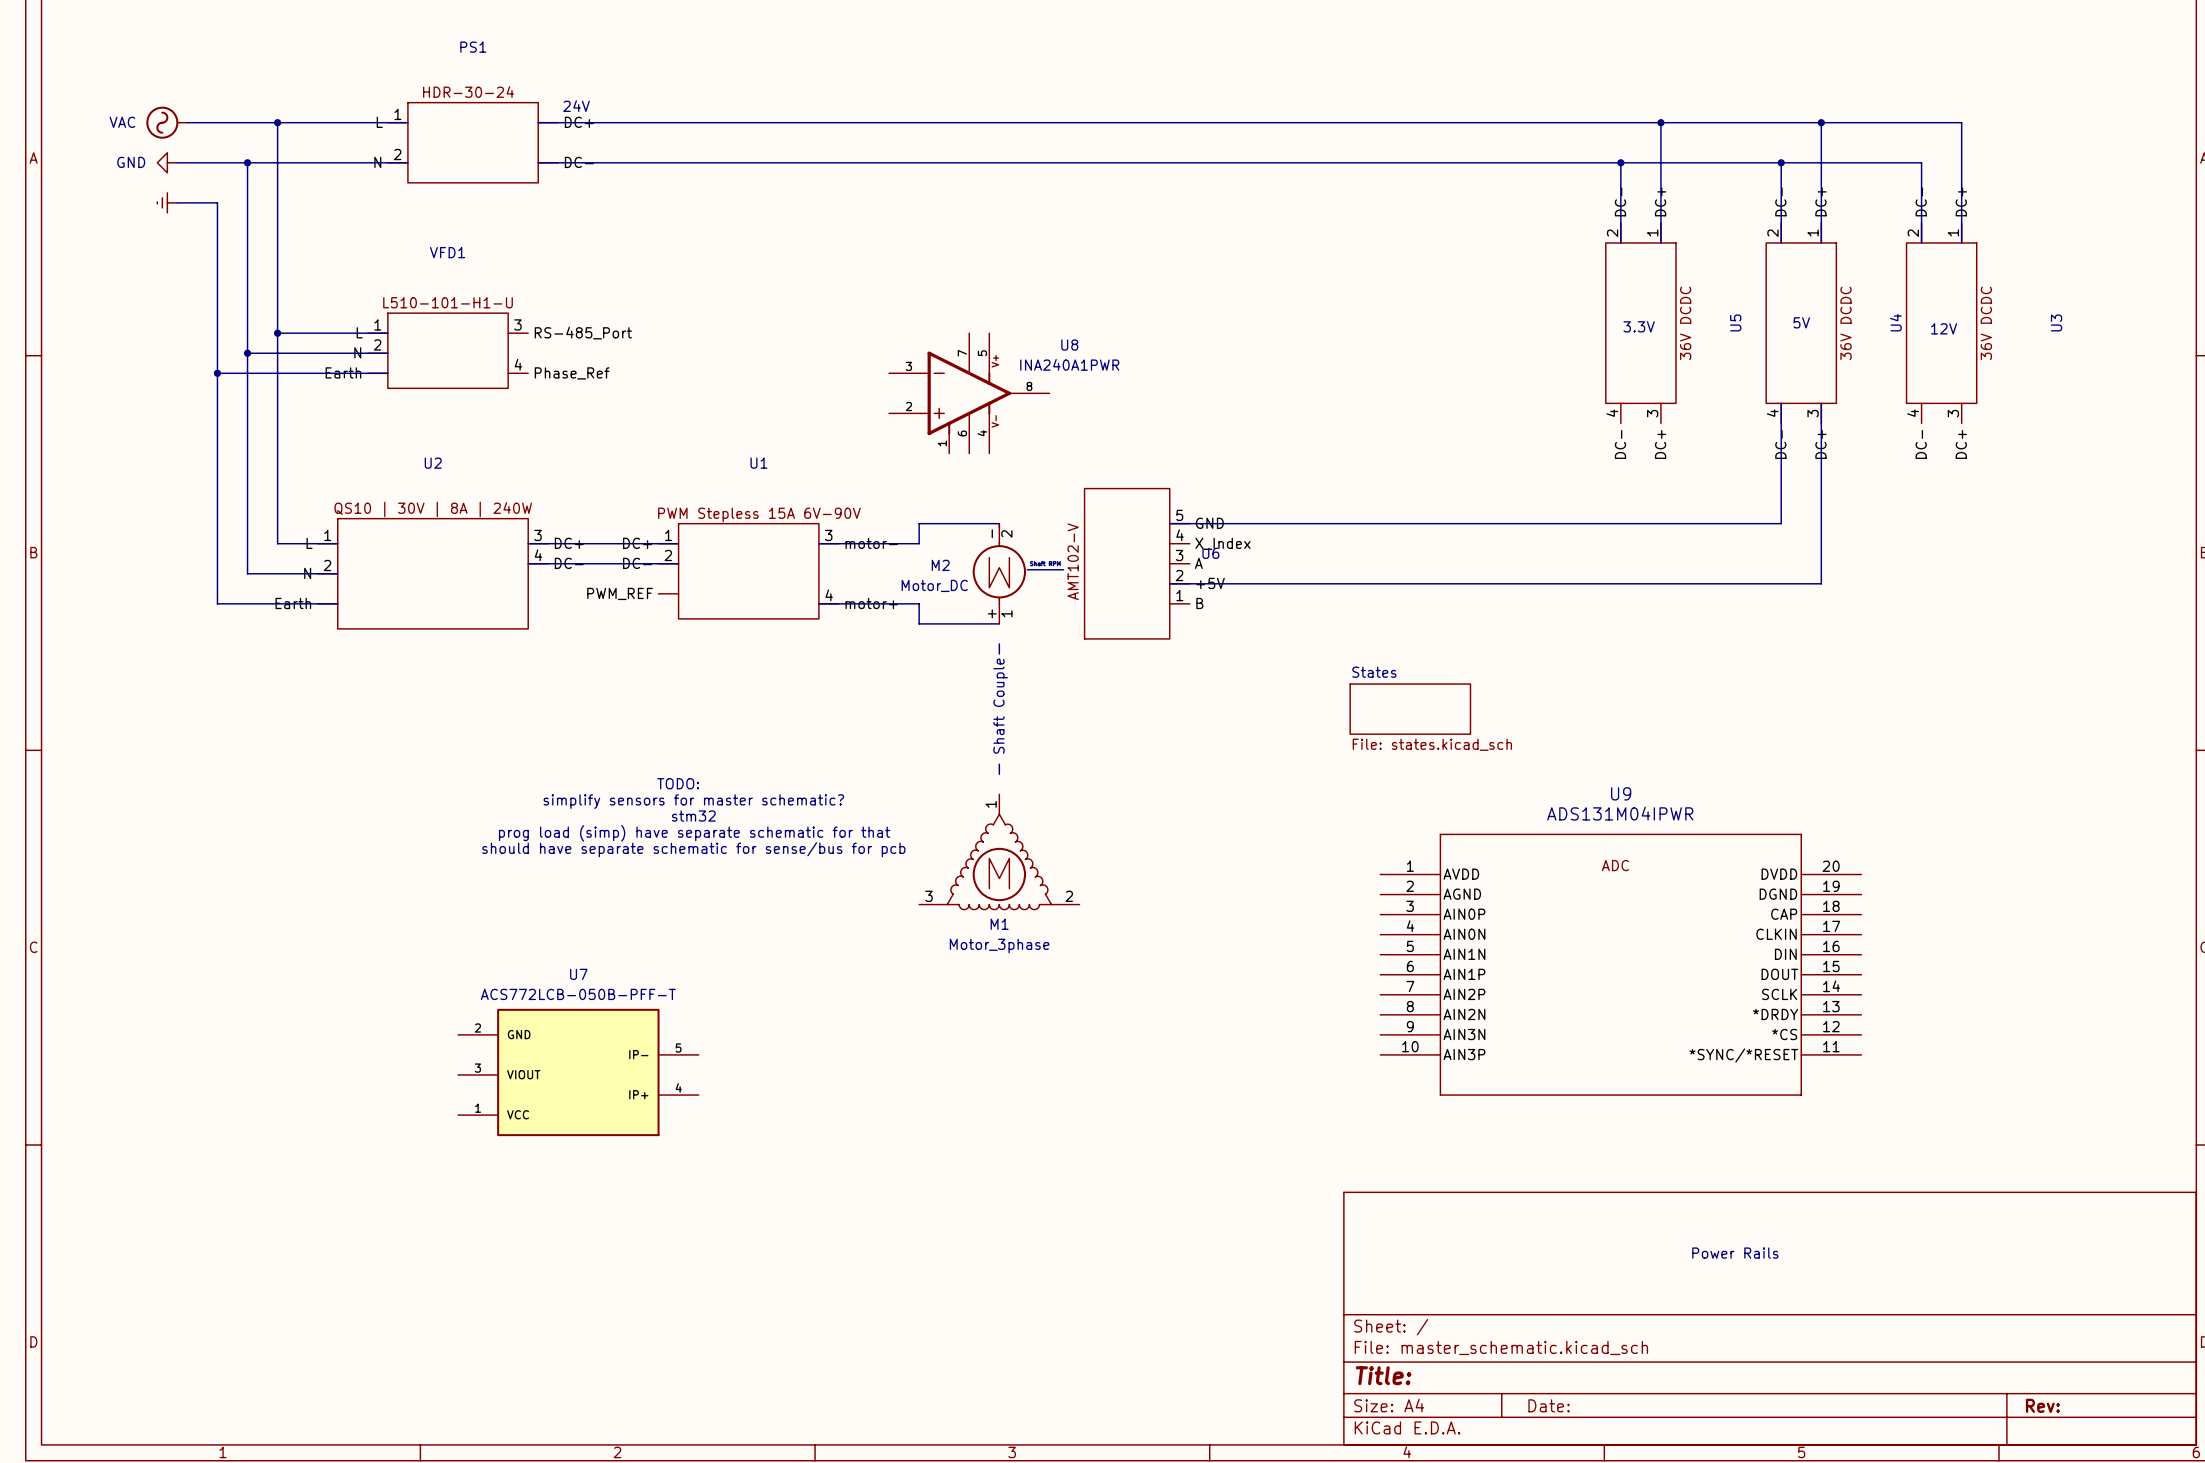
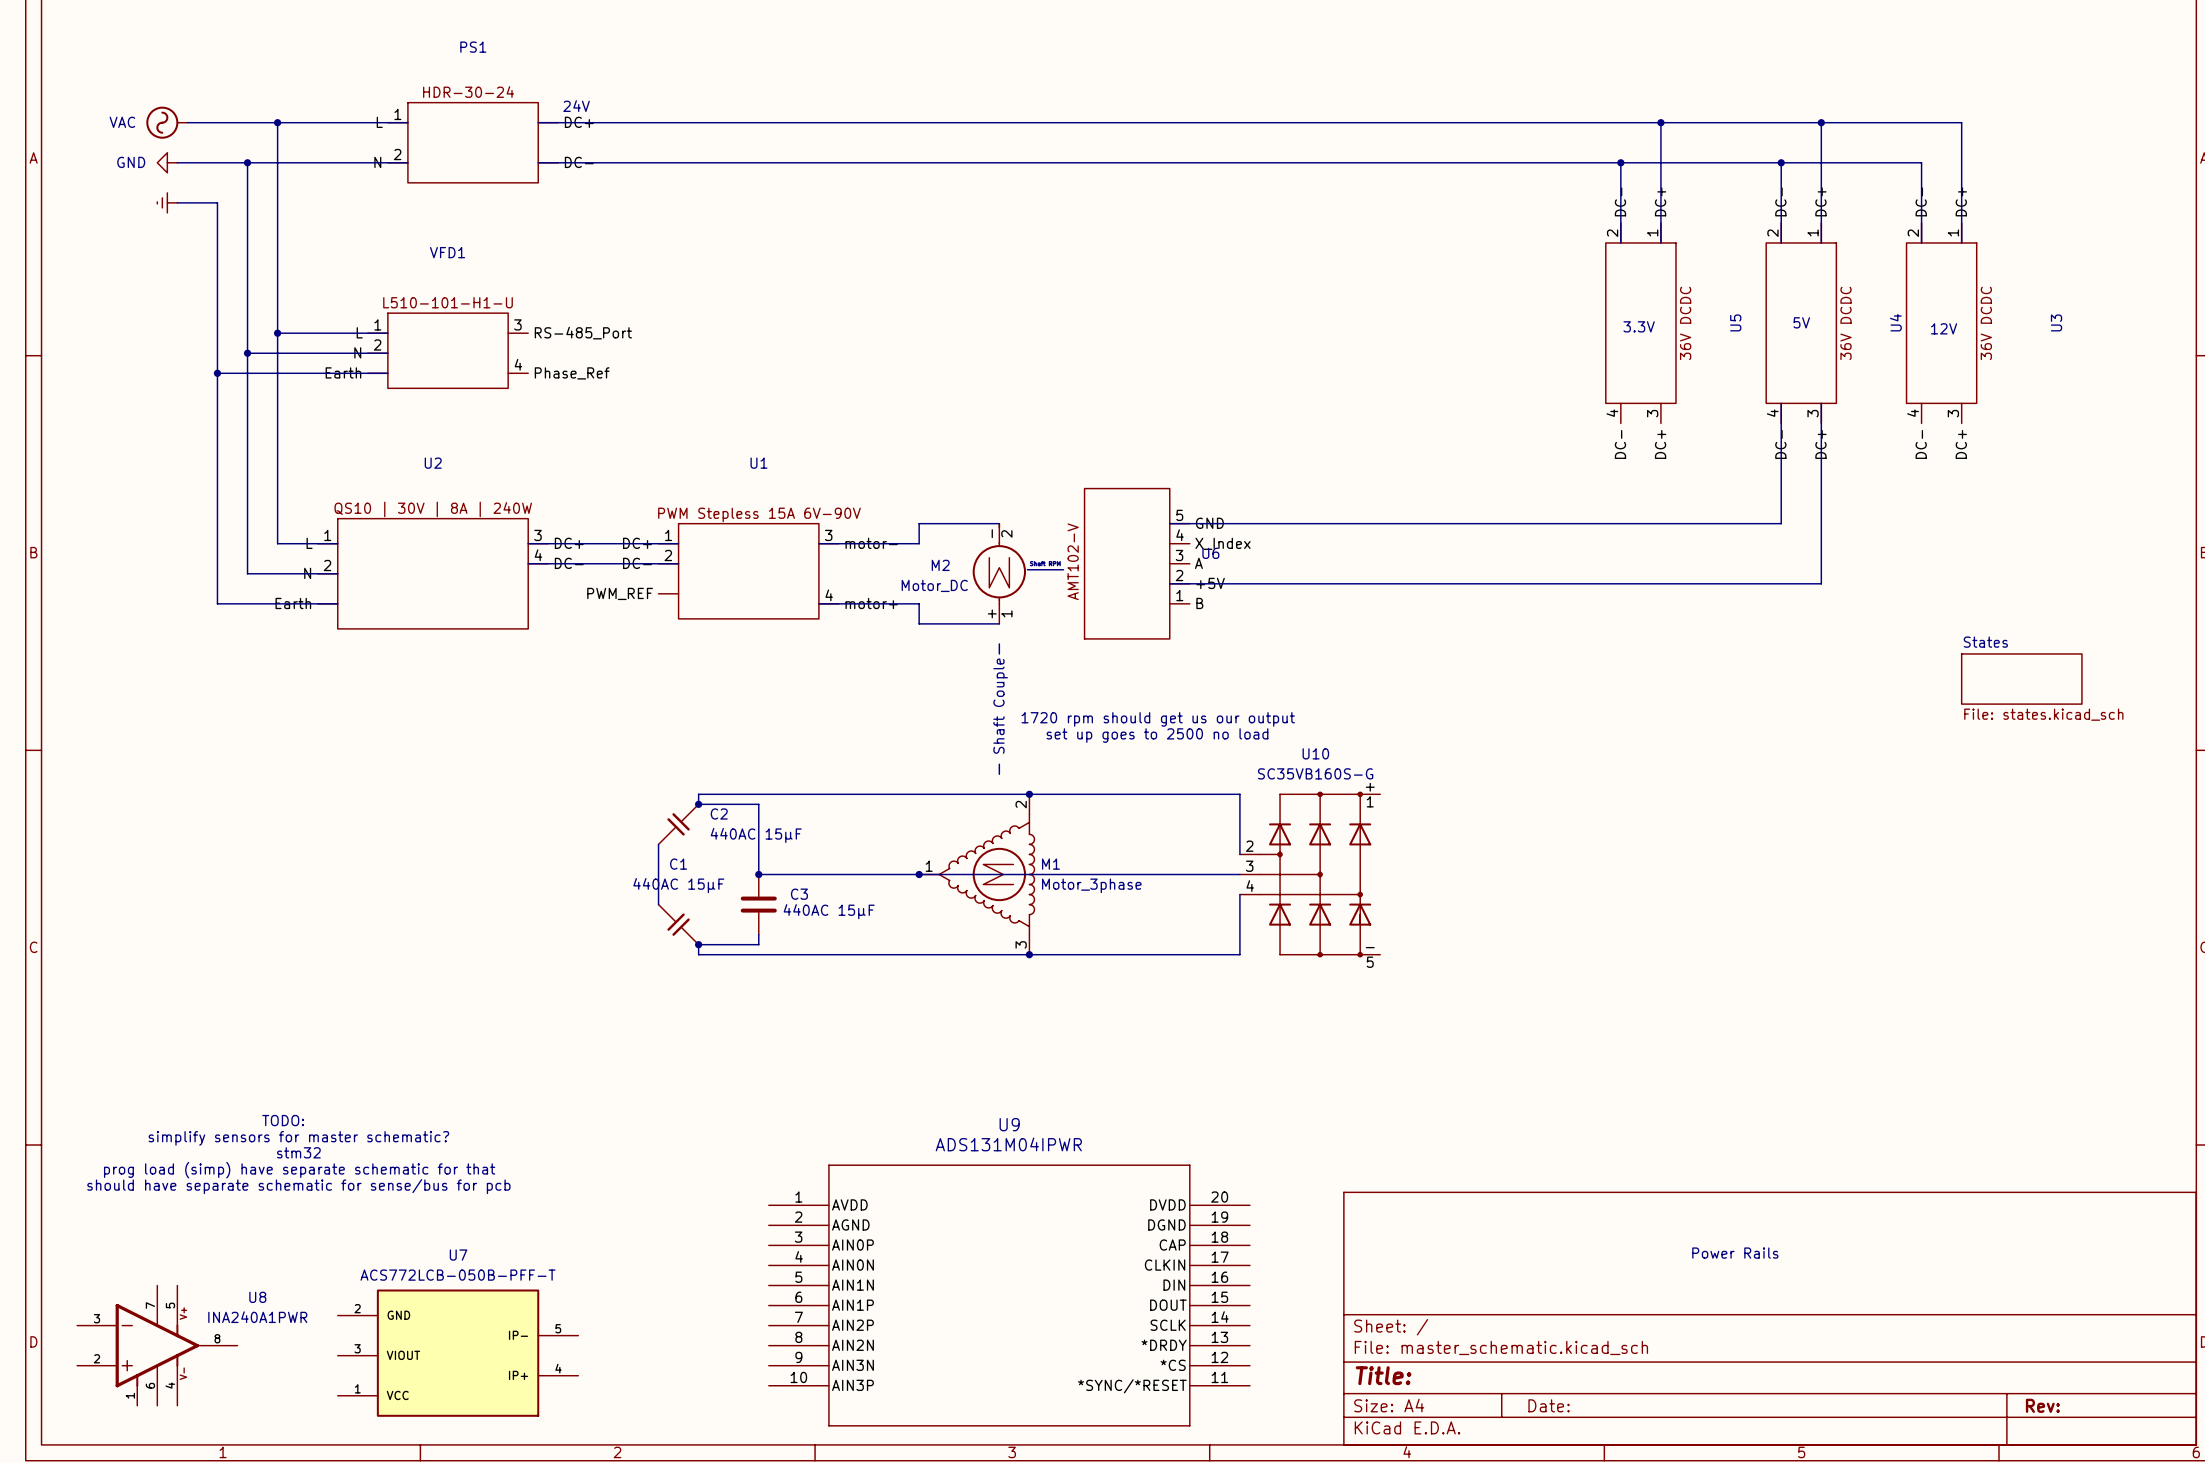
U8 position: (969, 393) -> (157, 1345)
sheet States: none -> File: states.kicad_sch (2021, 679)
sheet States: File: states.kicad_sch (1410, 709) -> none
text: none -> 1720 rpm should get us our output (1158, 719)
text: none -> set up goes to 2500 no load (1157, 735)
text: TODO: (678, 783) -> none
junction: none -> (1029, 794)
text: simplify sensors for master schematic? (693, 801) -> none
junction: none -> (698, 804)
text: stm32 (693, 816) -> none
C2: none -> 440AC 15μF (678, 824)
text: prog load (simp) have separate schematic for that (694, 833) -> none
wire: none -> (658, 844) (658, 904)
text: should have separate schematic for sense/bus for pcb (693, 849) -> none
wire: none -> (1239, 854) (1239, 794) (698, 794) (698, 804) (758, 804) (758, 874) (1239, 874)
M1 rotation: 0° (999, 861) -> 90° counterclockwise (986, 874)
label: ADC (1615, 865) -> none
junction: none -> (758, 874)
junction: none -> (919, 874)
U10: none -> SC35VB160S-G (1310, 874)
wire: none -> (1239, 894) (1239, 954) (698, 954) (698, 944) (758, 944) (758, 934)
C3: none -> (758, 904)
text: none -> 440AC 15μF (829, 911)
C1: none -> 440AC 15μF (678, 924)
junction: none -> (698, 944)
M1 value position: Motor_3phase (999, 945) -> Motor_3phase (1091, 885)
junction: none -> (1029, 954)
U9 position: (1620, 964) -> (1009, 1295)
U7 position: (578, 1072) -> (458, 1353)
text: none -> TODO: (283, 1120)
text: none -> simplify sensors for master schematic? (298, 1138)
text: none -> stm32 (298, 1152)
text: none -> prog load (simp) have separate schematic for that (299, 1170)
text: none -> should have separate schematic for sense/bus for pcb (298, 1186)

